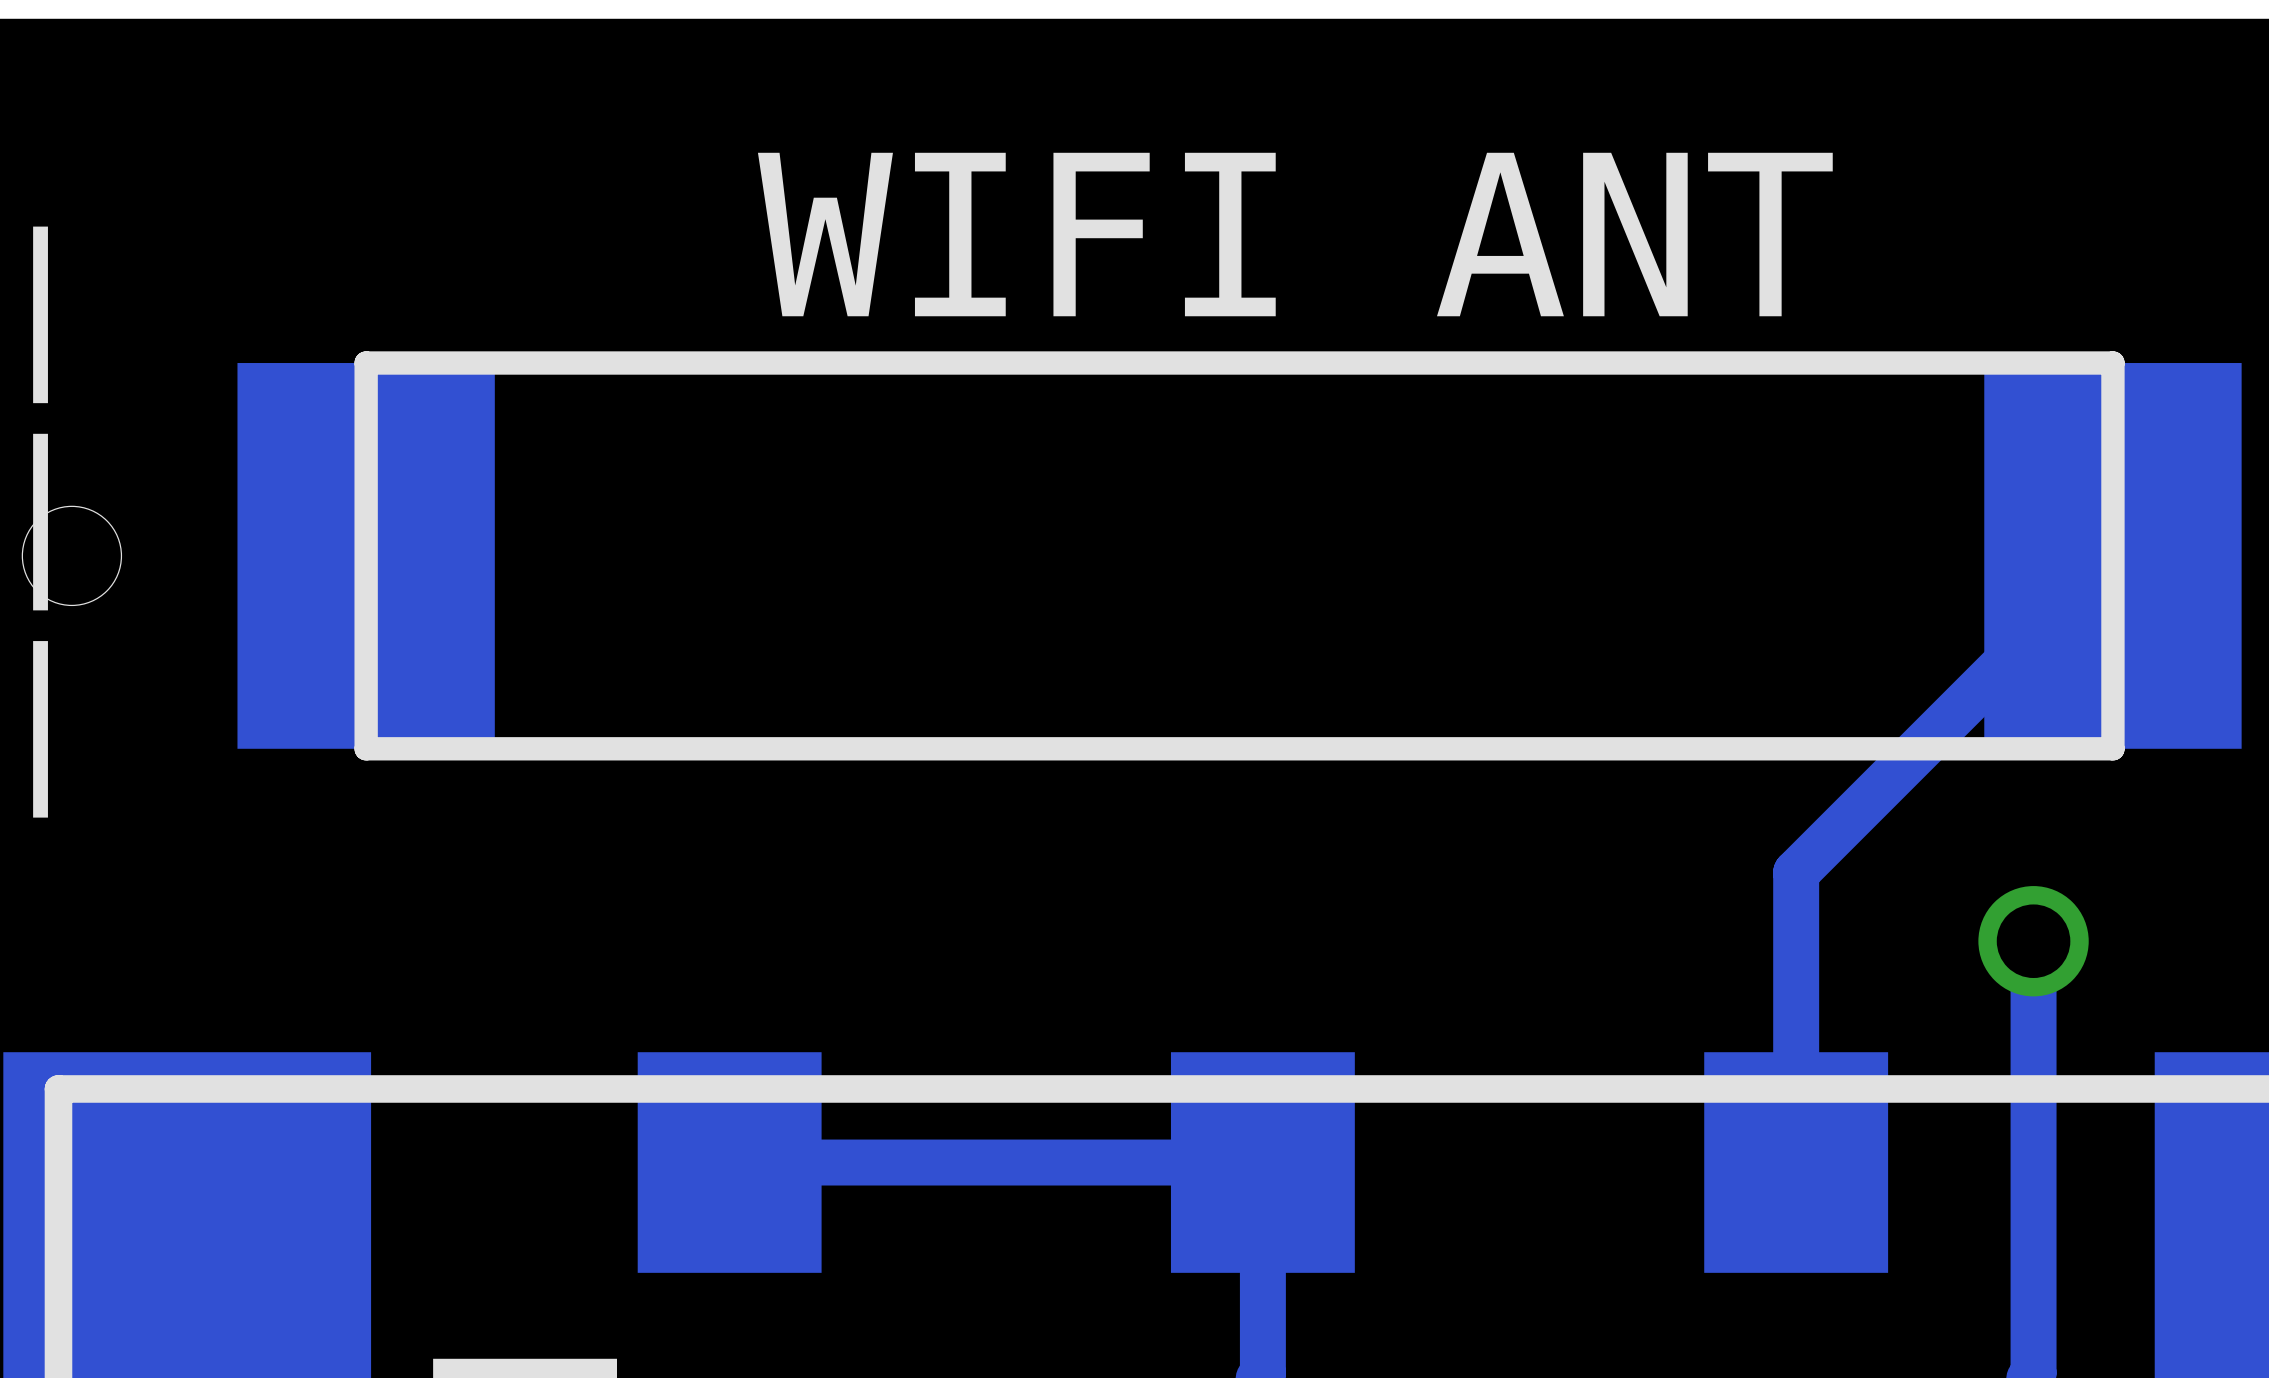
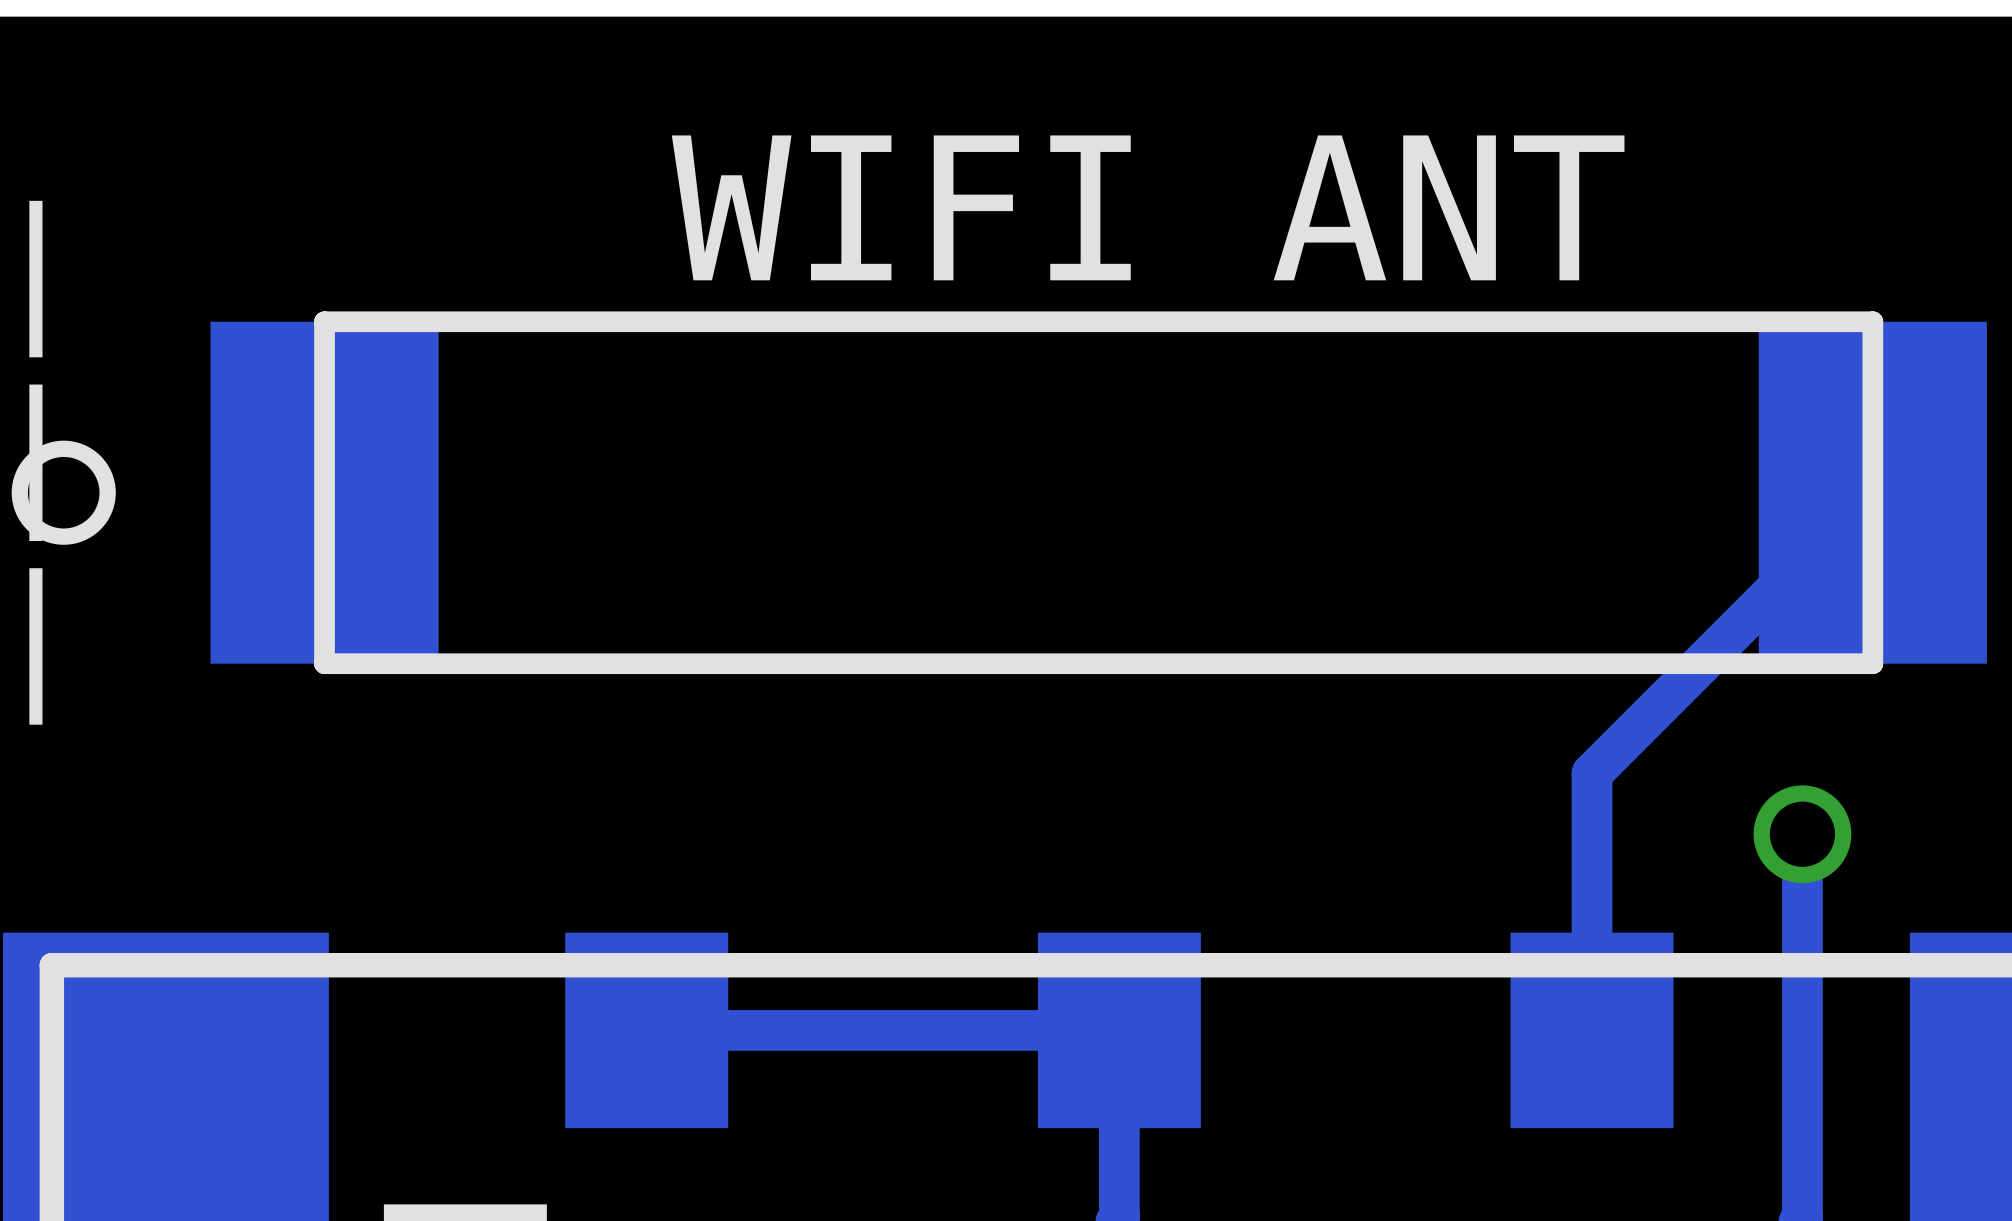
WIFI ANT footprint: [22, 351, 2242, 761] -> [11, 311, 1987, 675]

